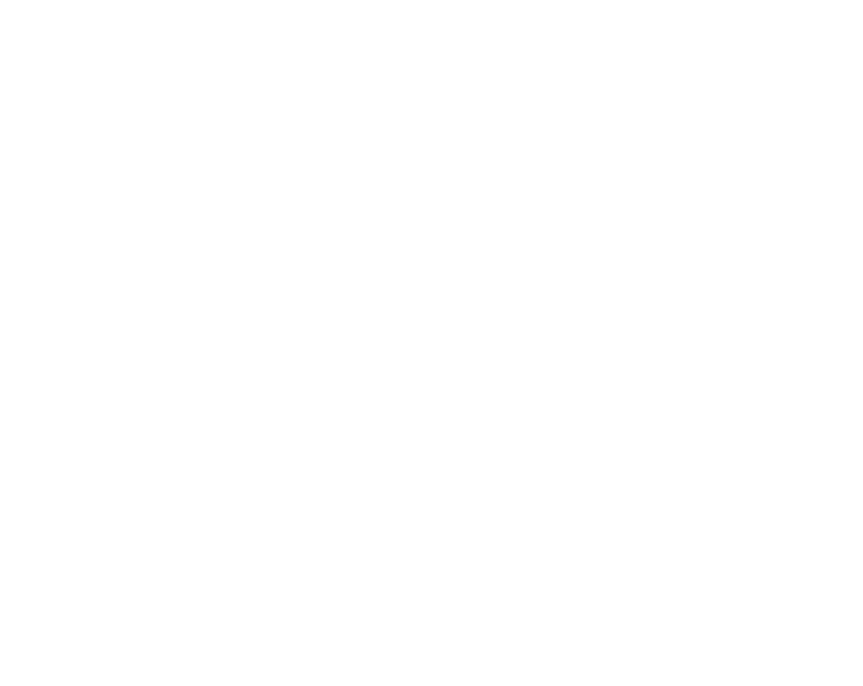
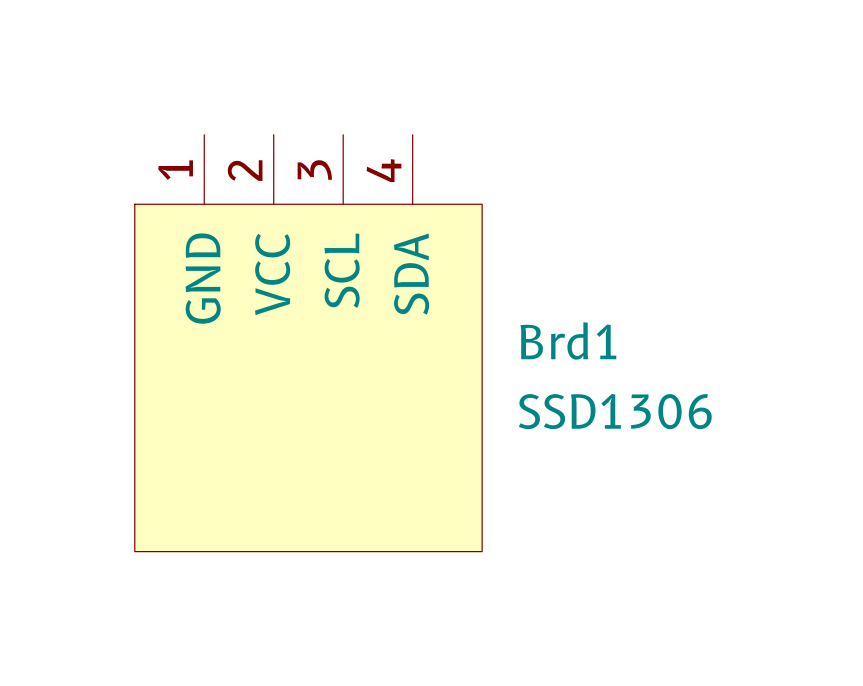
Brd1: none -> SSD1306 (308, 343)

